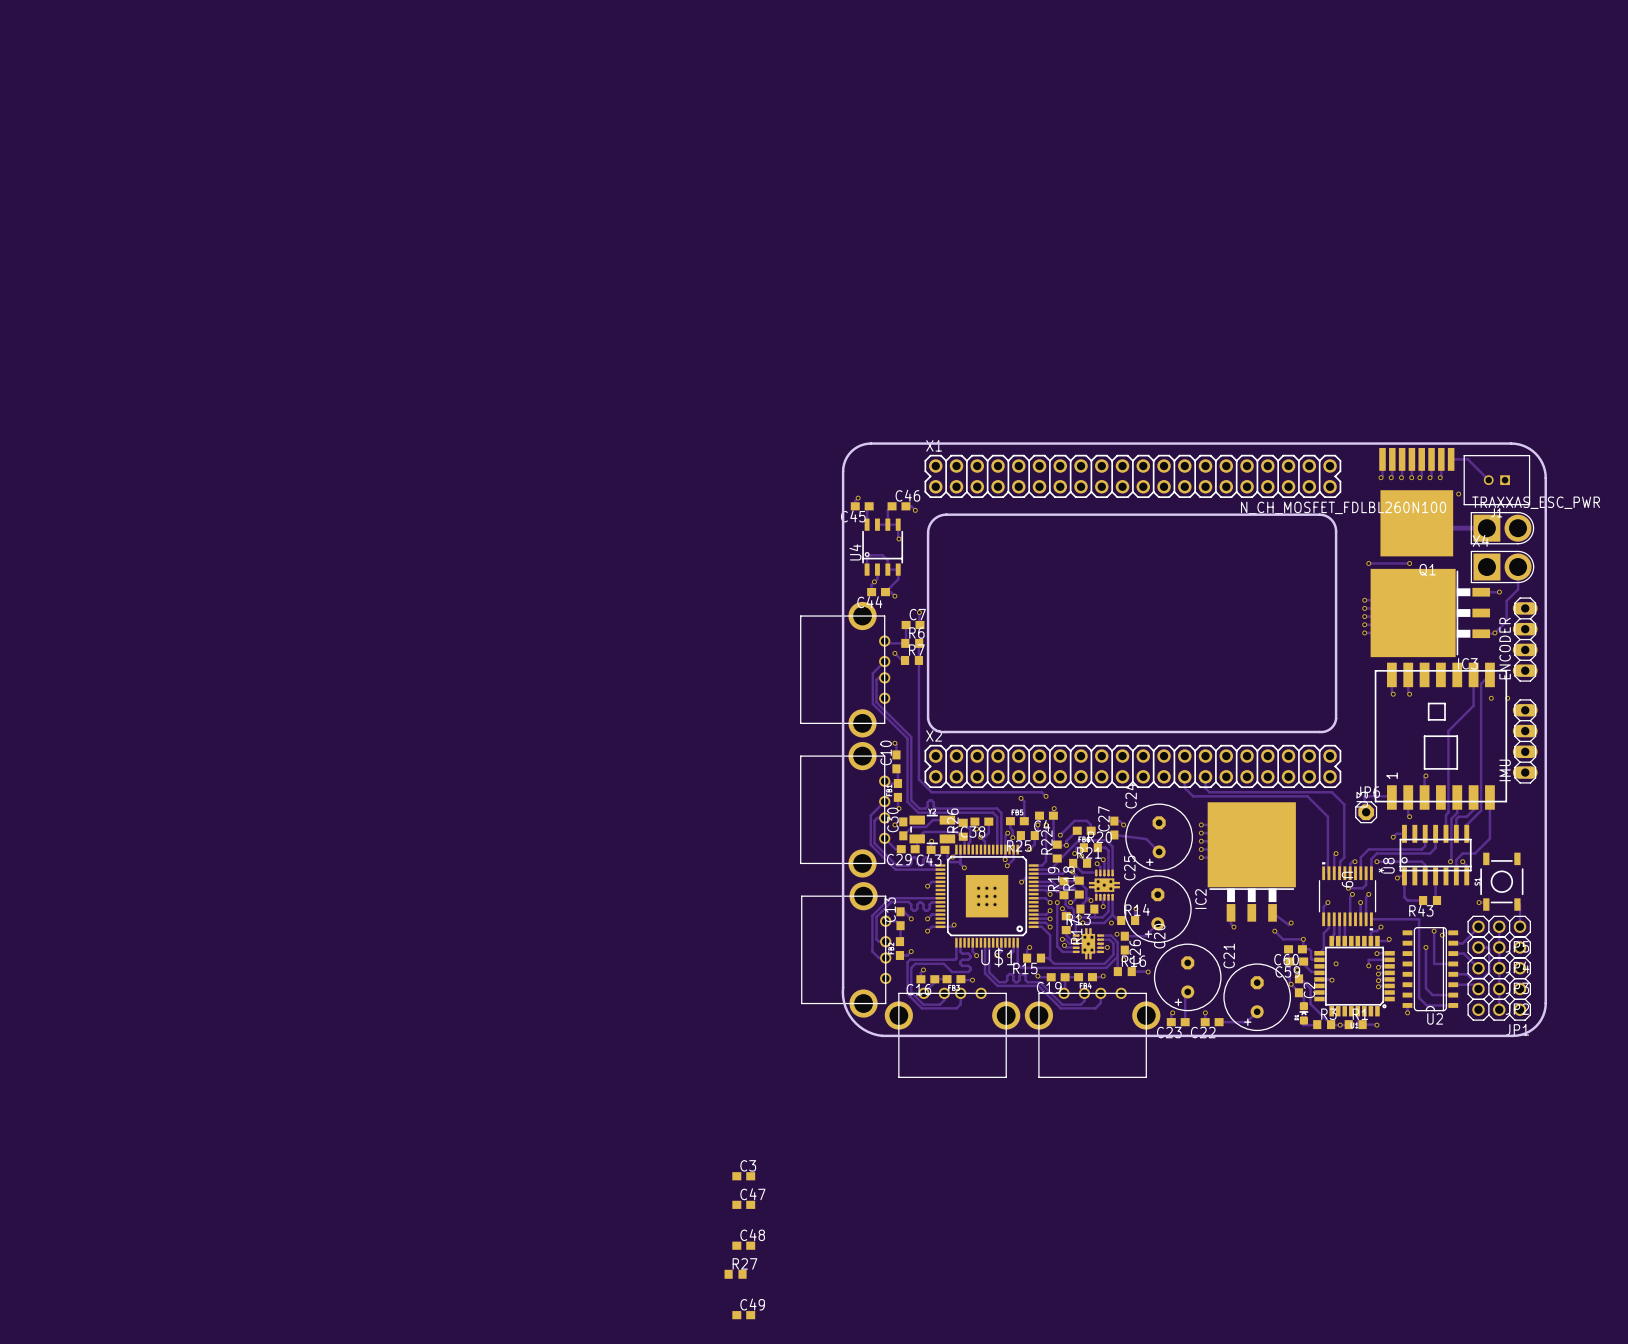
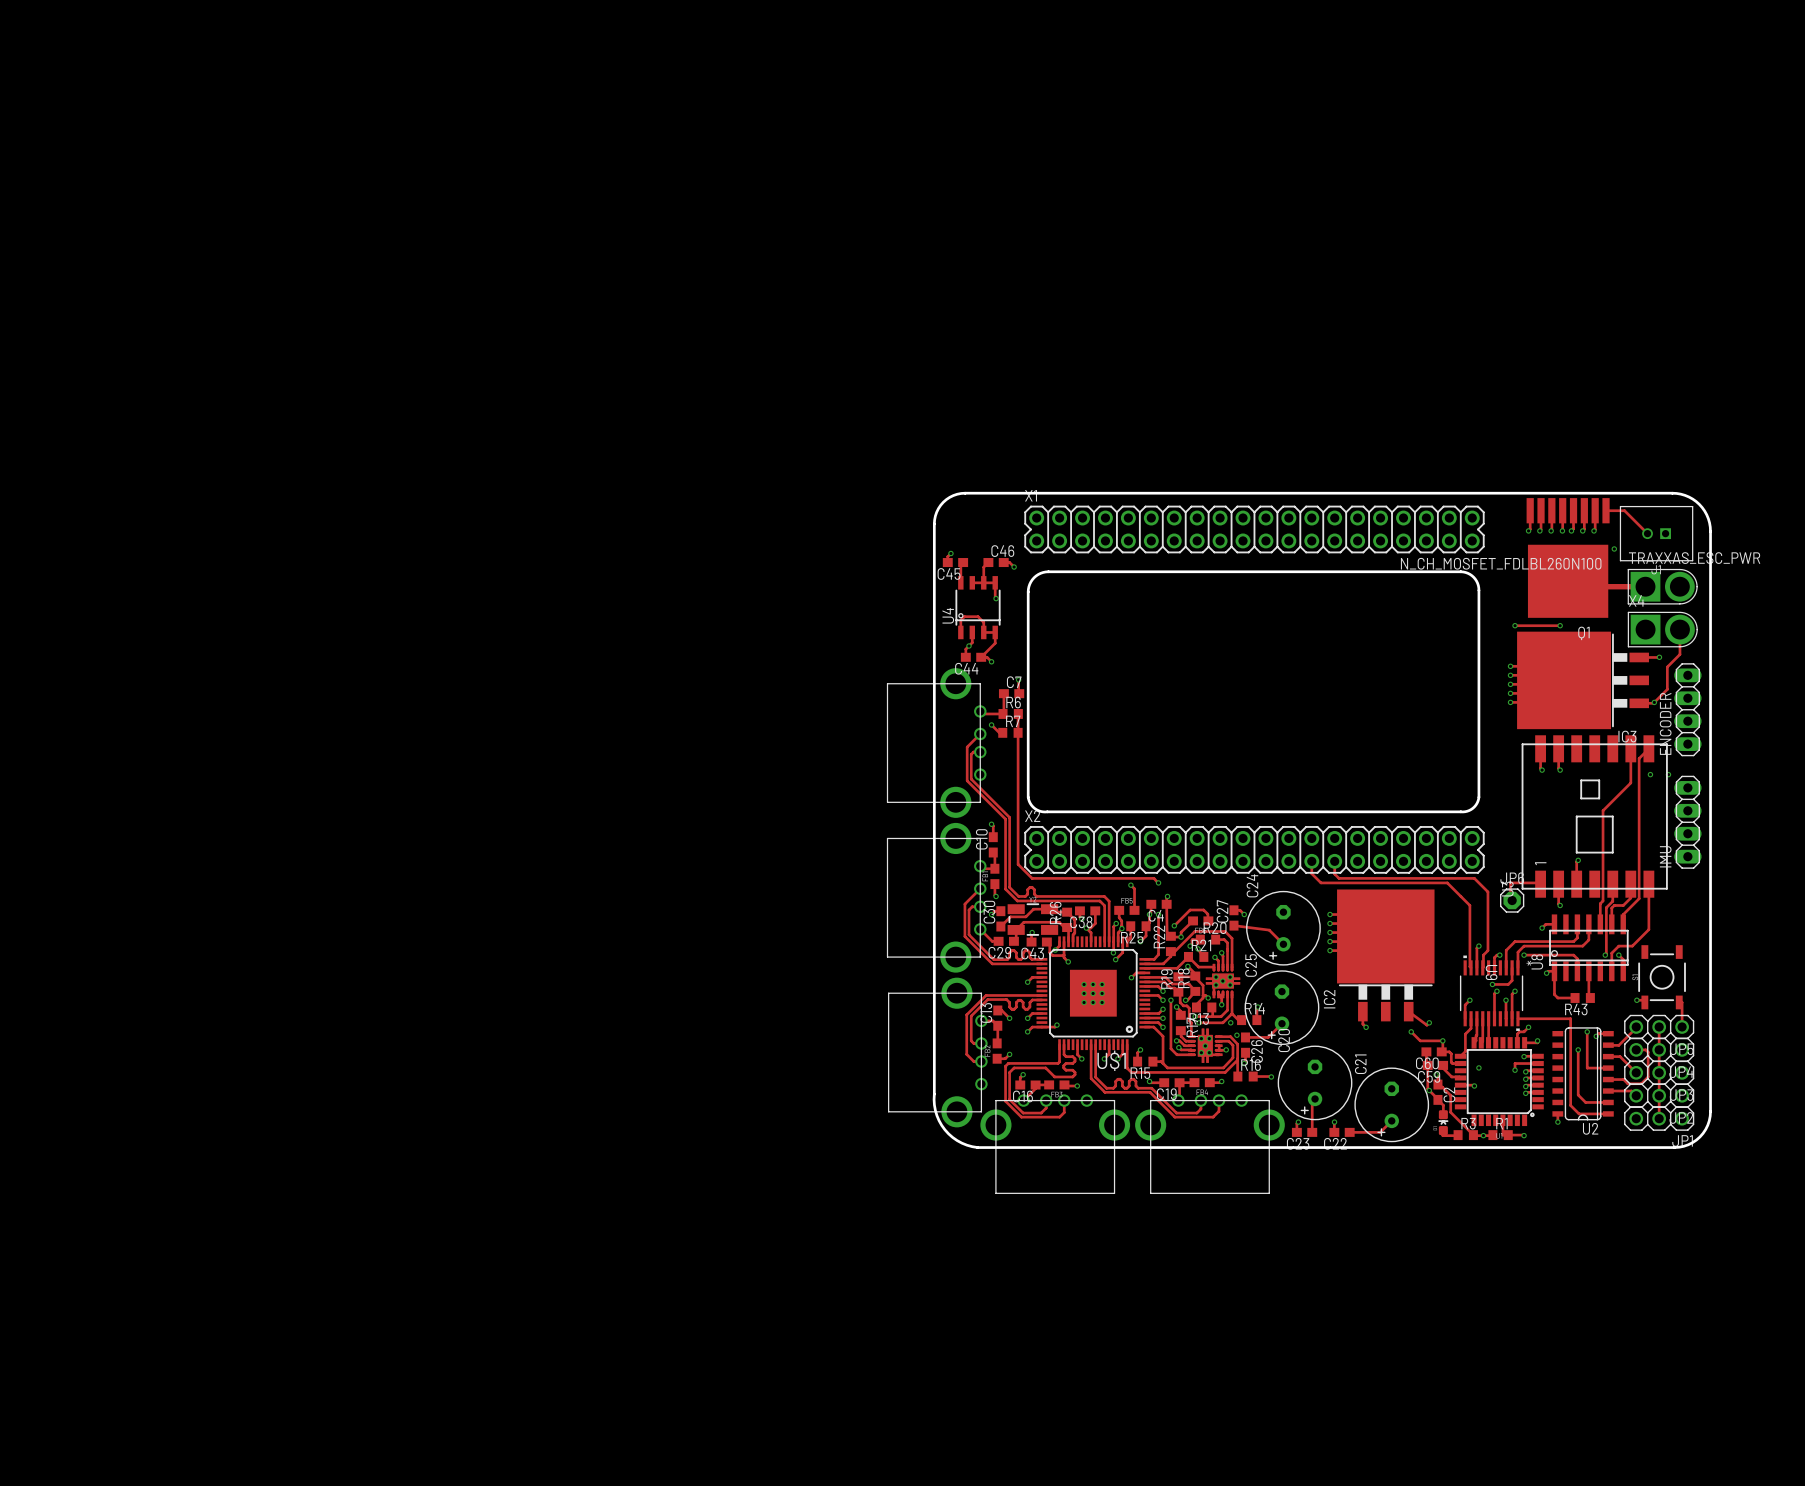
C3: (743, 1176) -> none
C47: (743, 1204) -> none
C48: (743, 1245) -> none
R27: (735, 1274) -> none
C49: (743, 1315) -> none

